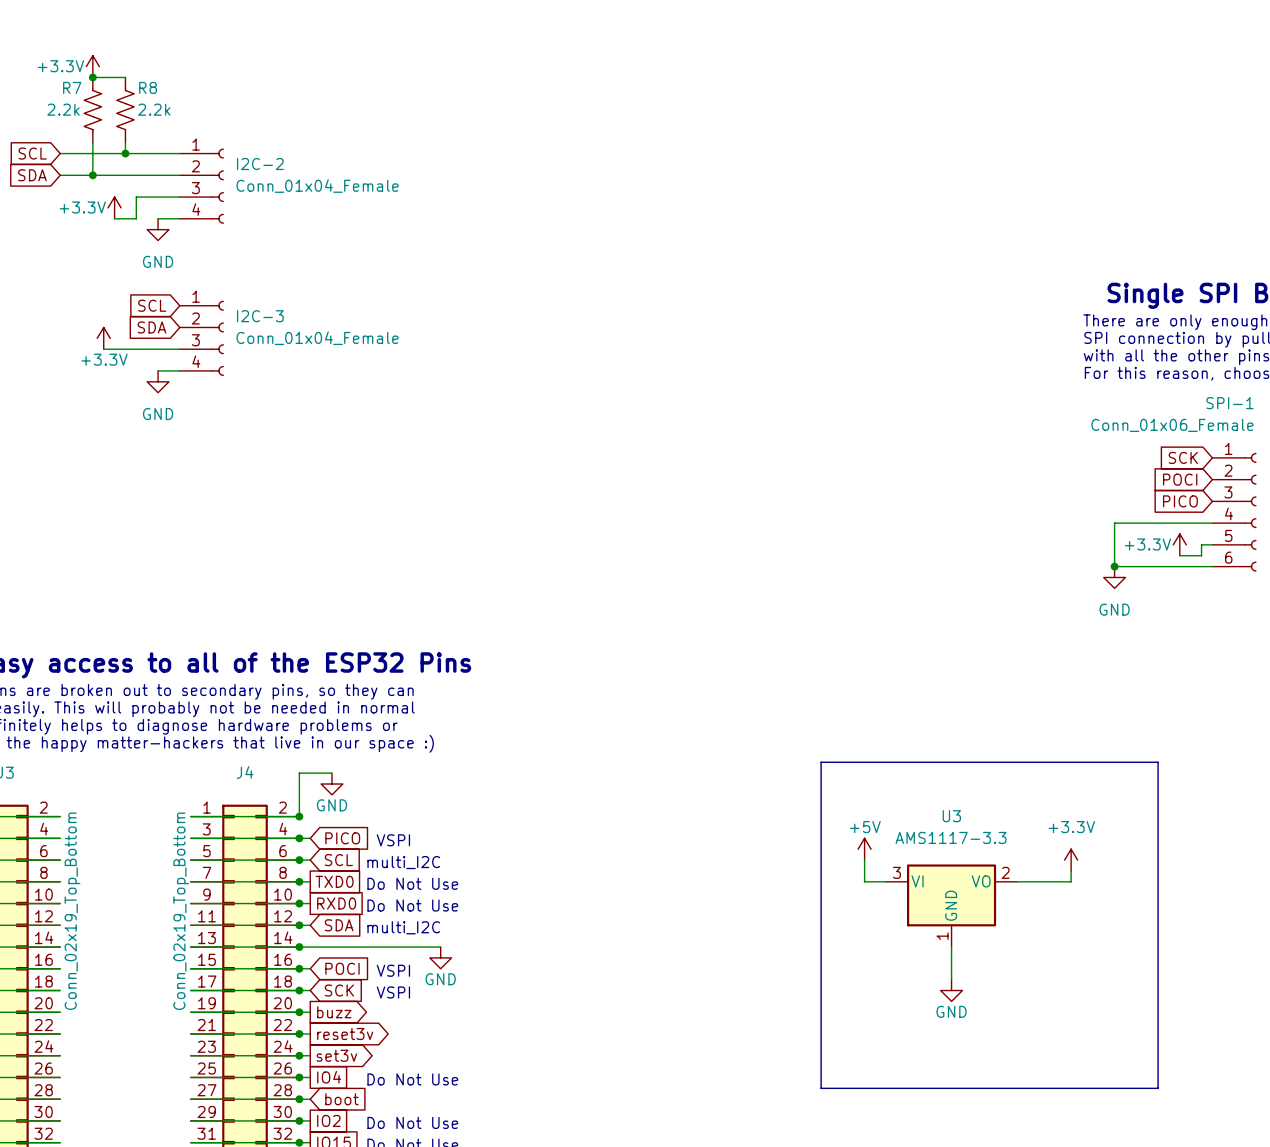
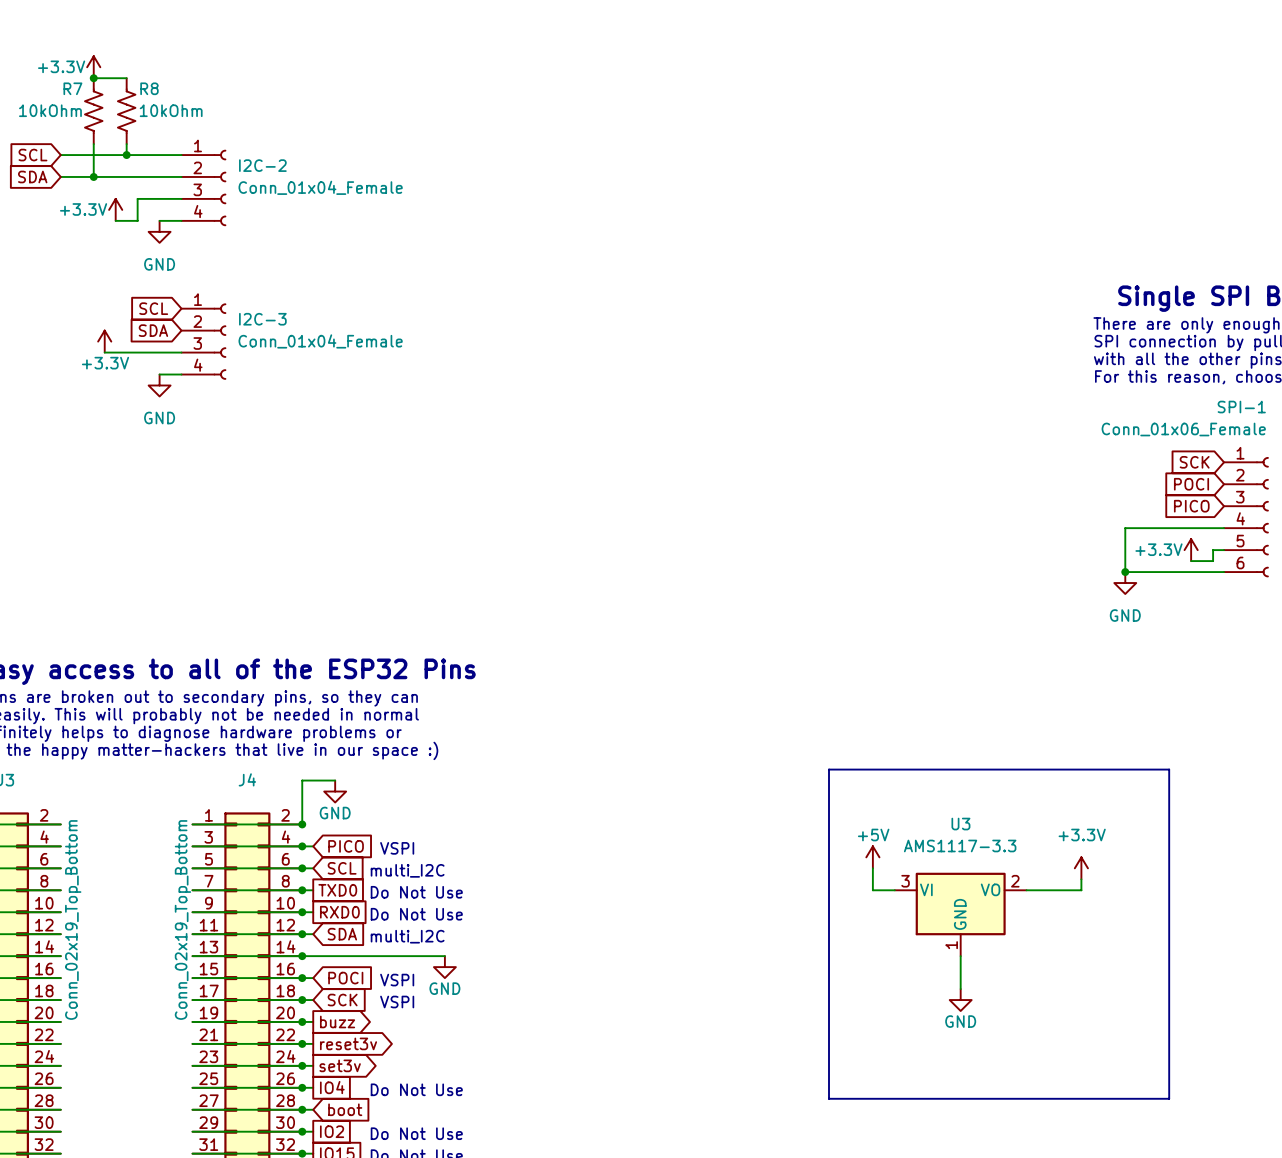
R7 value: 2.2k (63, 109) -> 10kOhm (50, 110)
R8 value: 2.2k (154, 109) -> 10kOhm (171, 110)

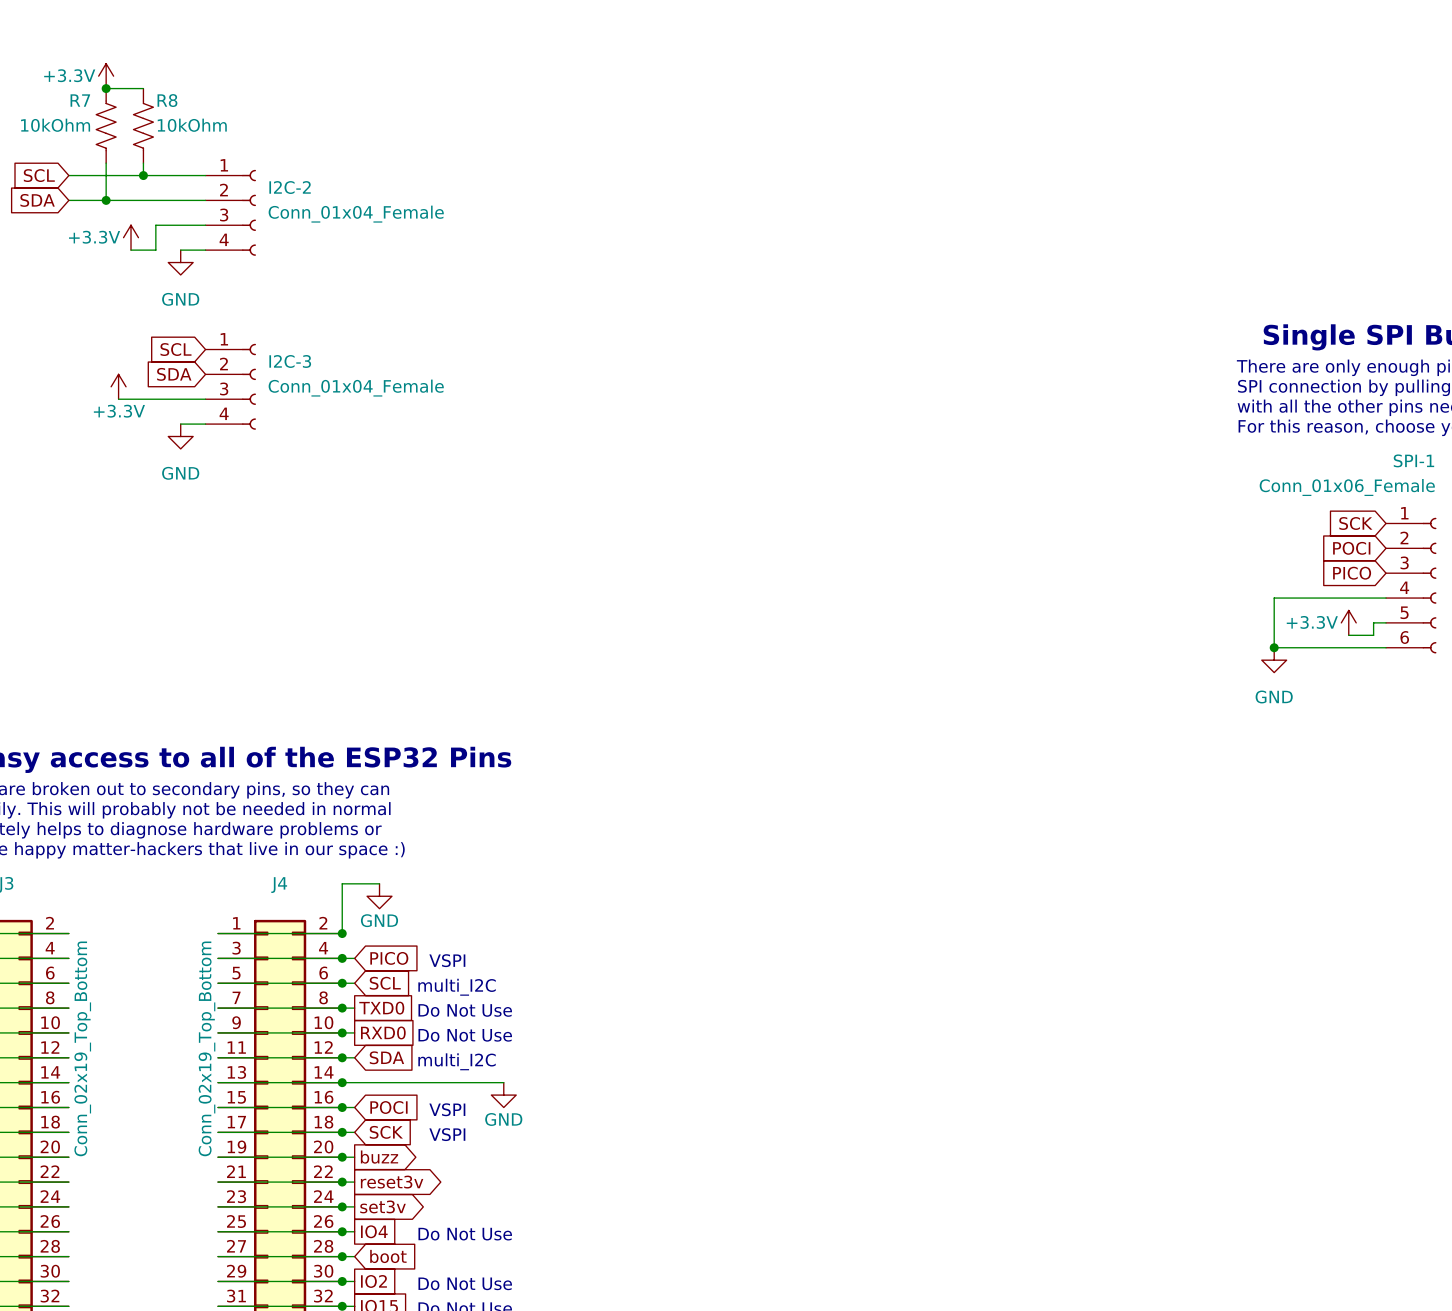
line: (828, 769) (828, 1098) (1169, 1098) (1169, 769) (828, 769) -> none
power symbol: +5V (872, 857) -> none
wire: (872, 868) (872, 890) (894, 890) -> none
power symbol: +3.3V (1081, 868) -> none
wire: (1081, 879) (1081, 890) (1026, 890) -> none
U3: AMS1117-3.3 (960, 914) -> none
wire: (960, 956) (960, 989) -> none
power symbol: GND (960, 1000) -> none

